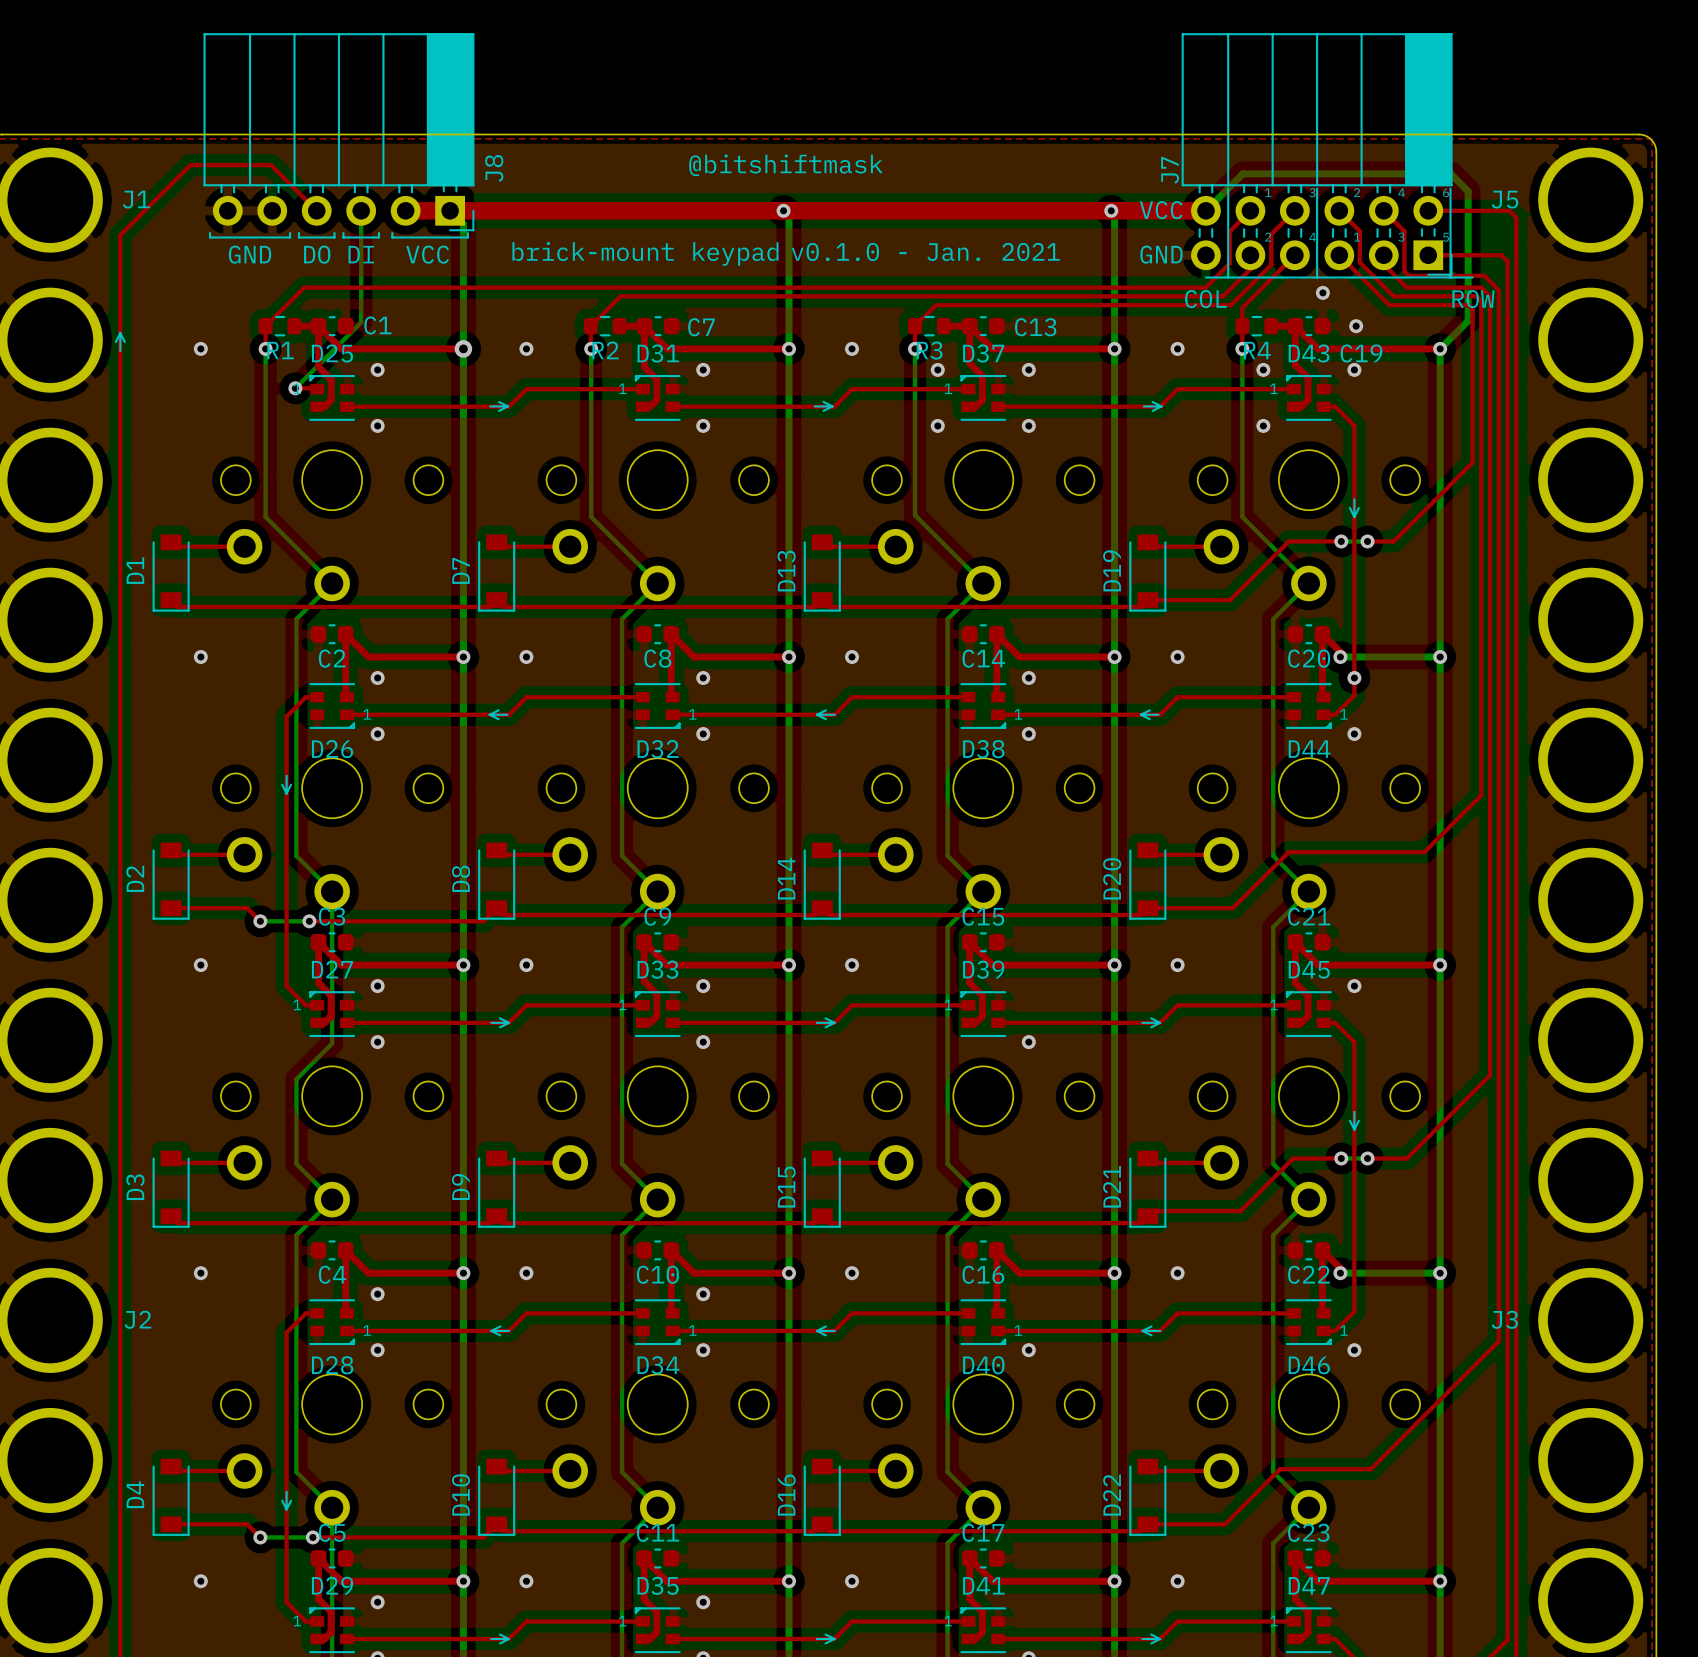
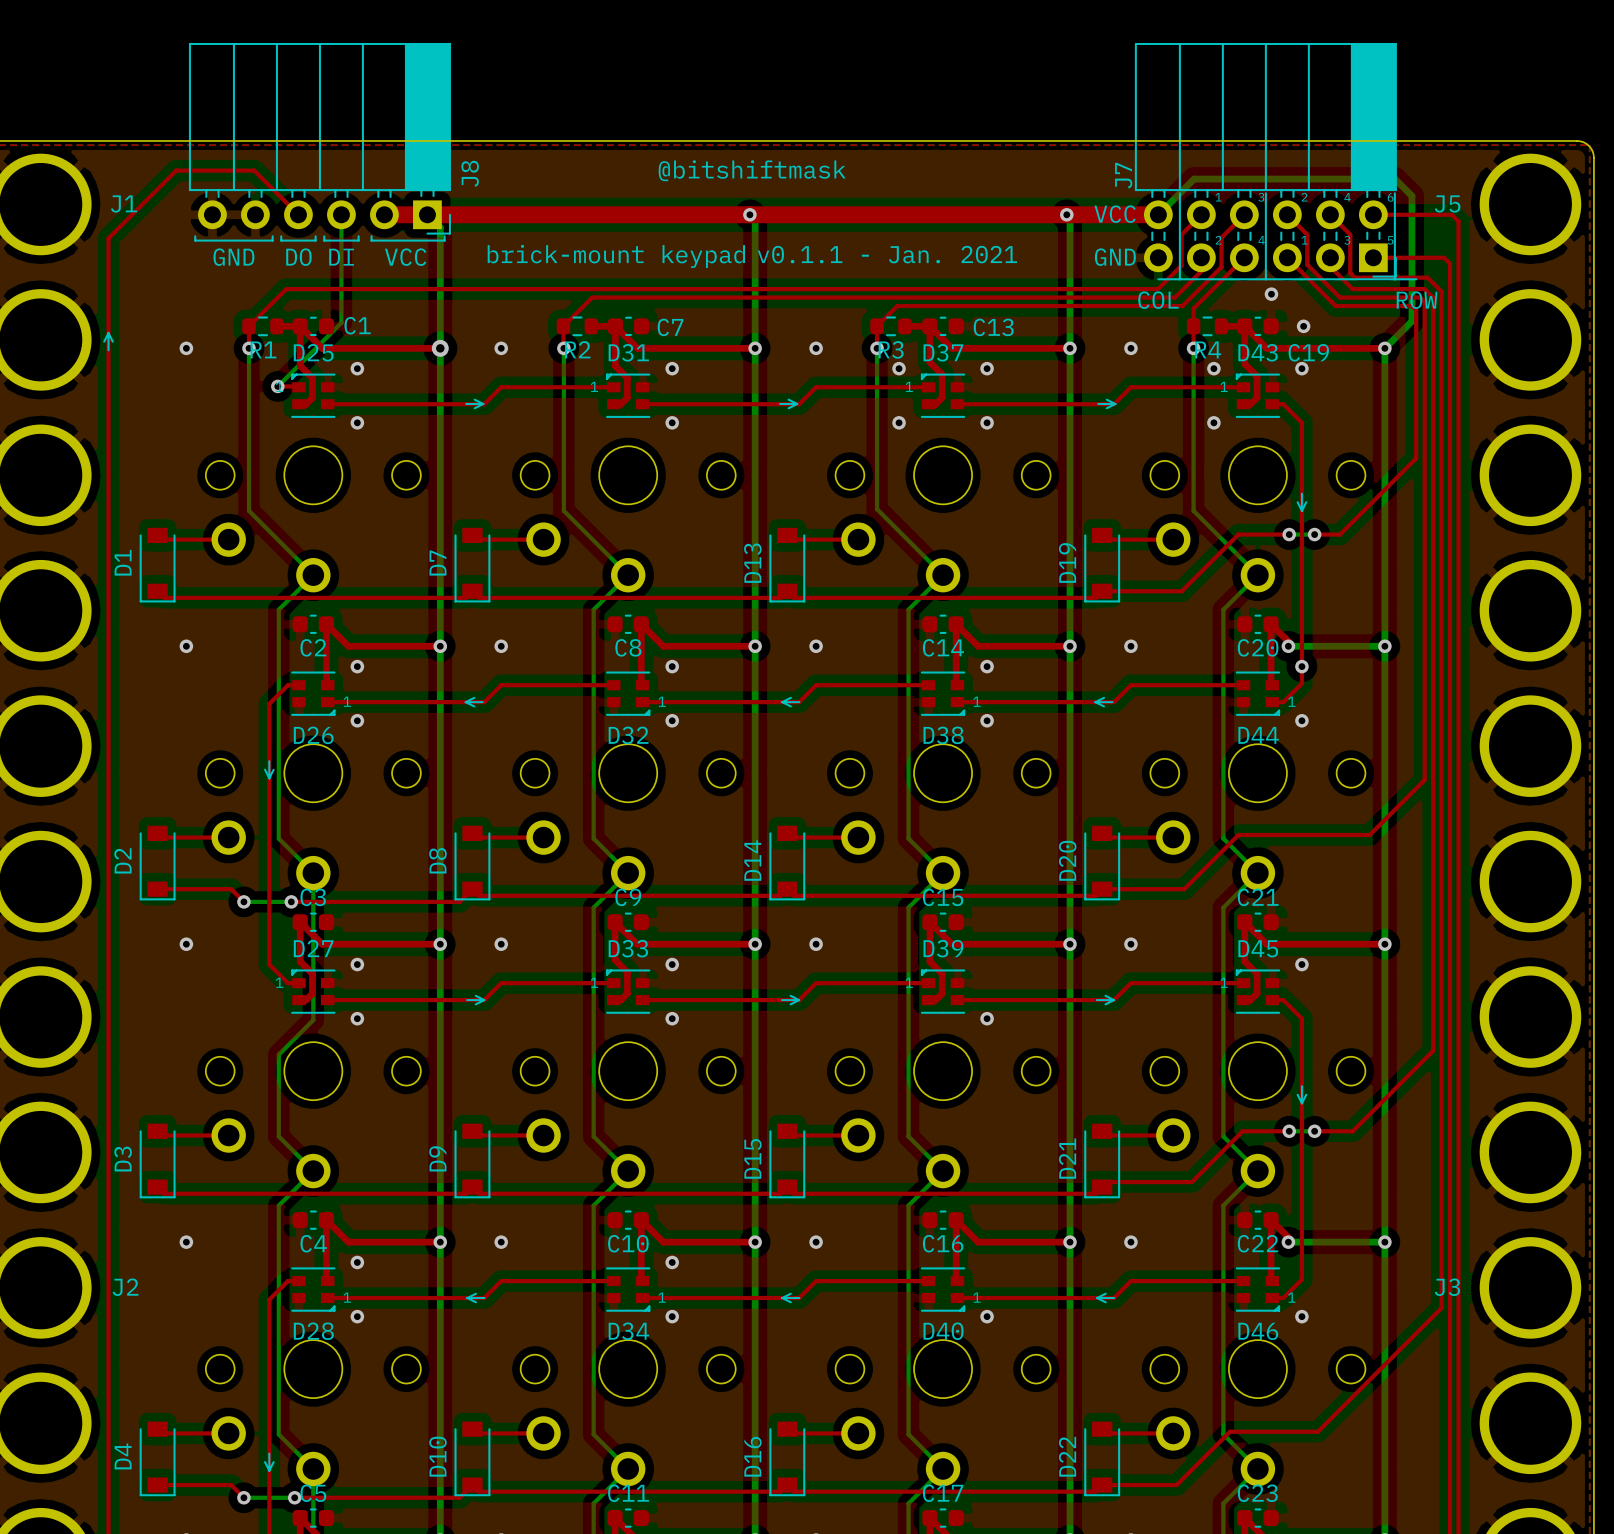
text: v0.1.0 - Jan. 2021 (925, 251) -> v0.1.1 - Jan. 2021 (887, 254)

